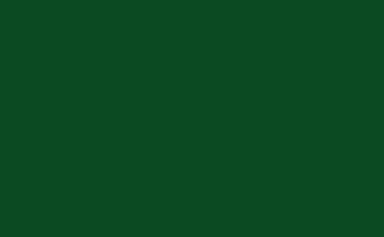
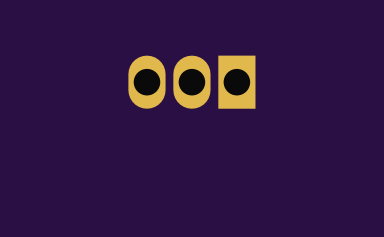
part: none -> (191, 82)

